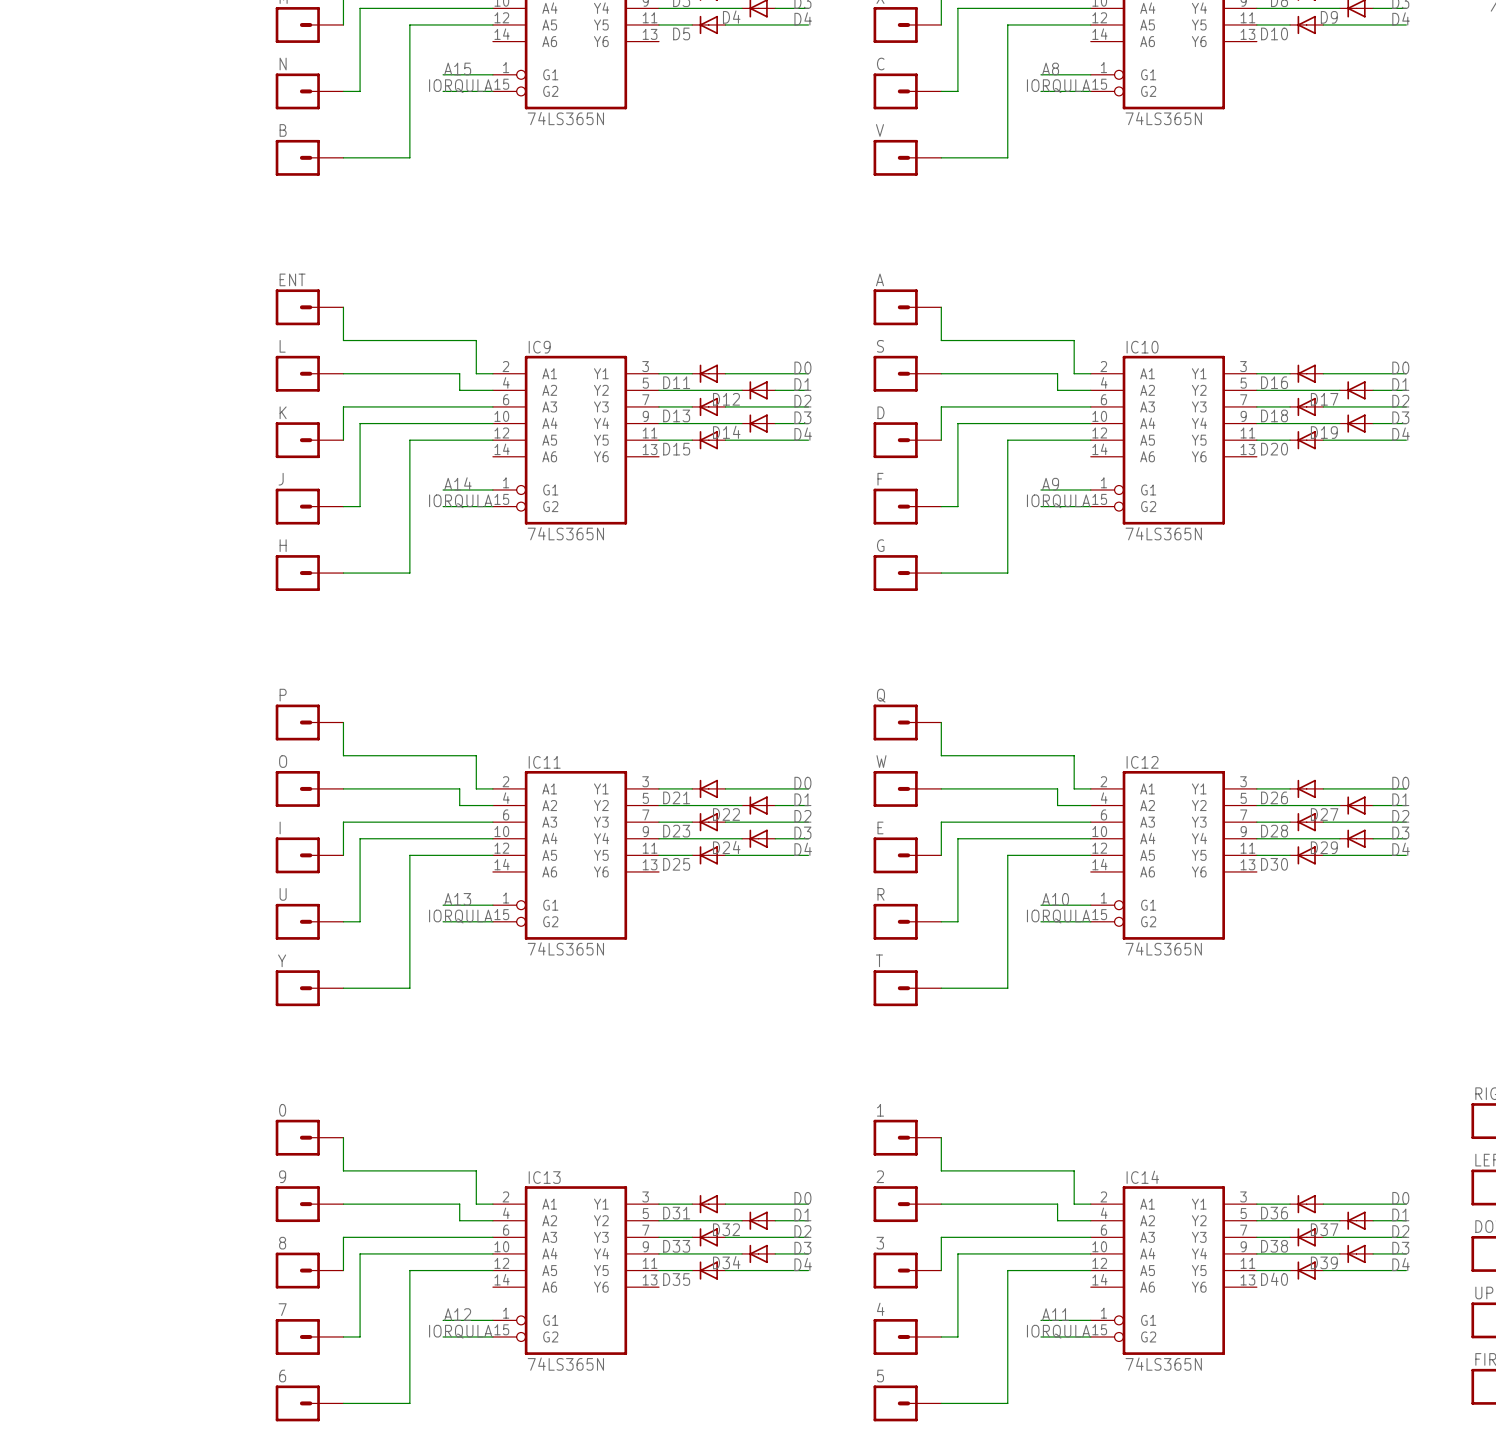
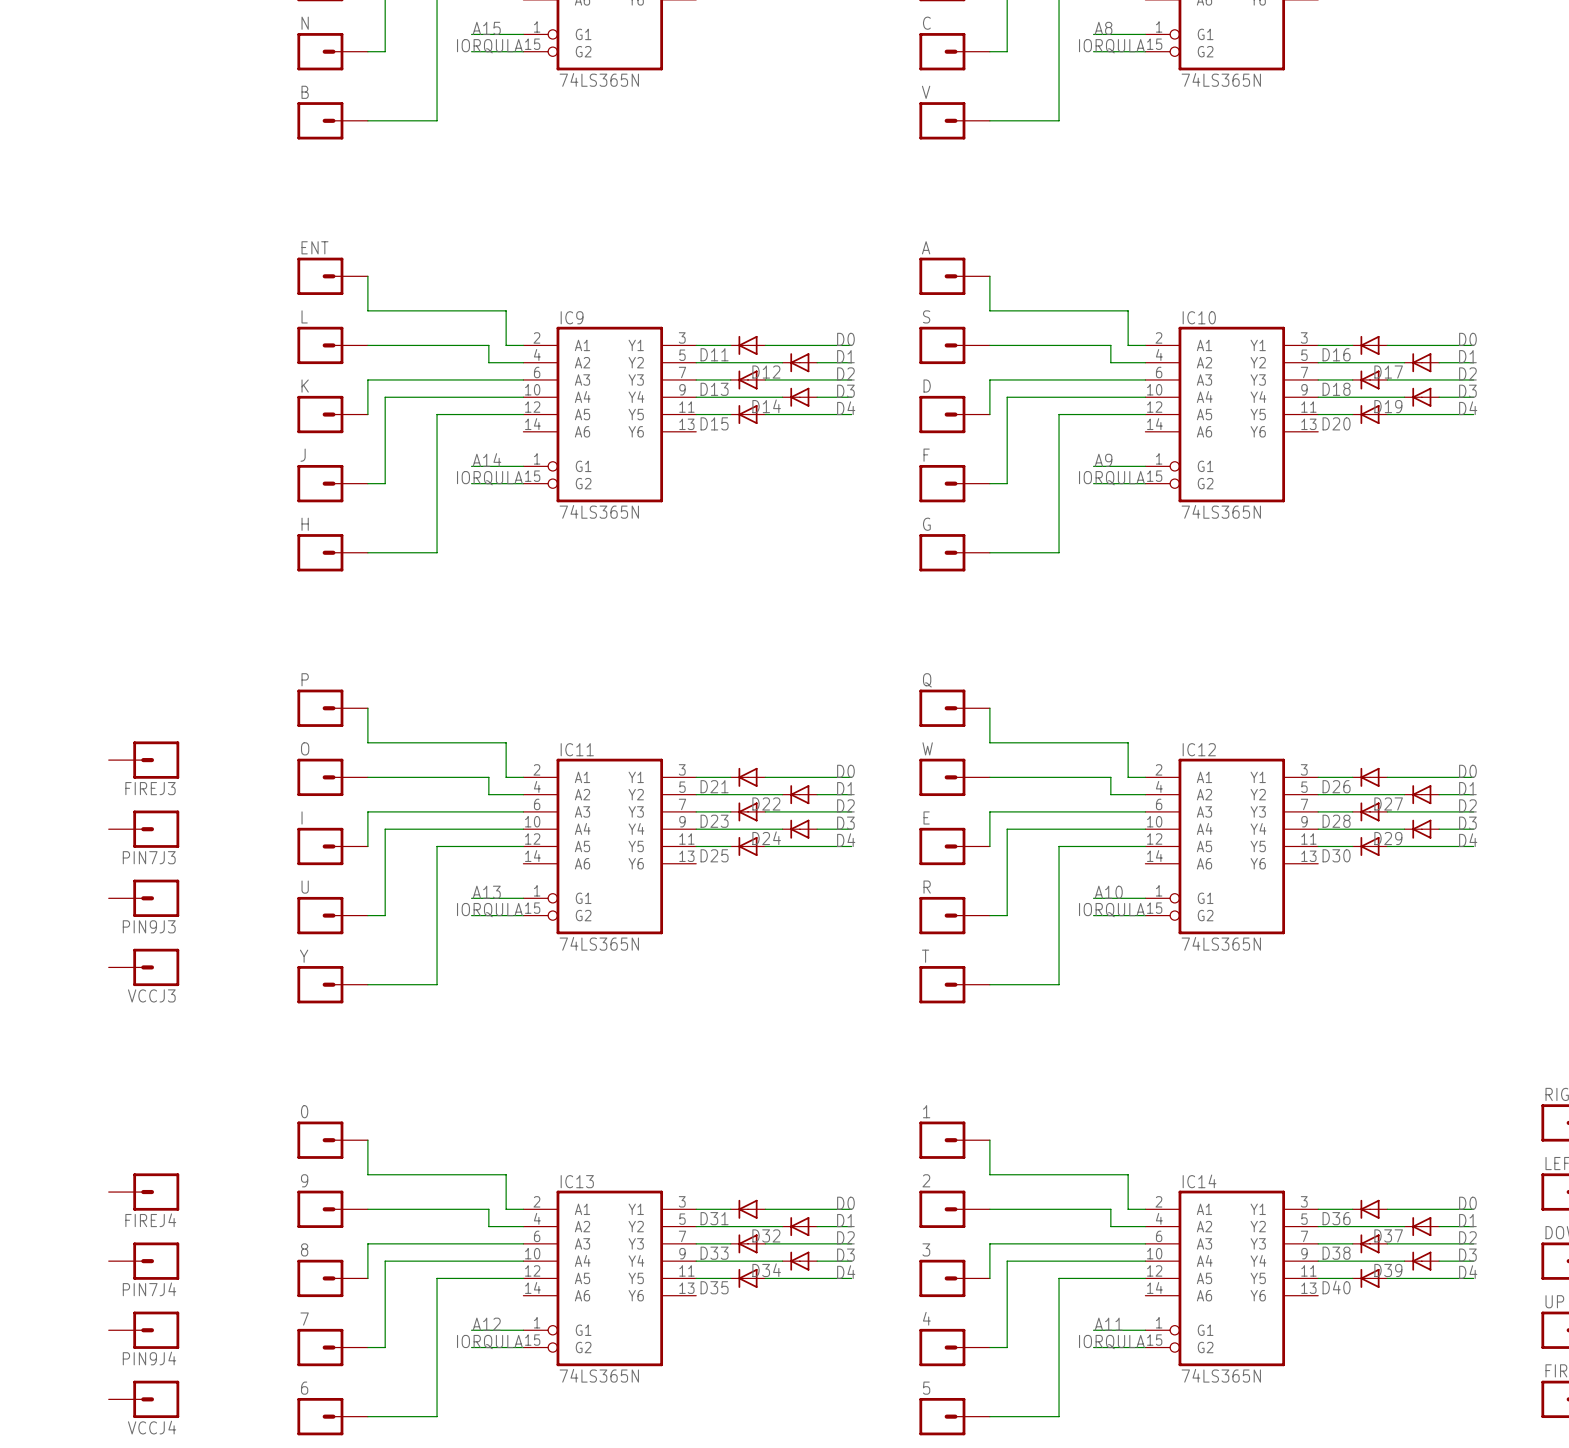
FIREJ3: none -> (143, 760)
PIN7J3: none -> (143, 829)
PIN9J3: none -> (143, 898)
VCCJ3: none -> (143, 967)
FIREJ4: none -> (143, 1192)
PIN7J4: none -> (143, 1261)
PIN9J4: none -> (143, 1330)
VCCJ4: none -> (143, 1399)

